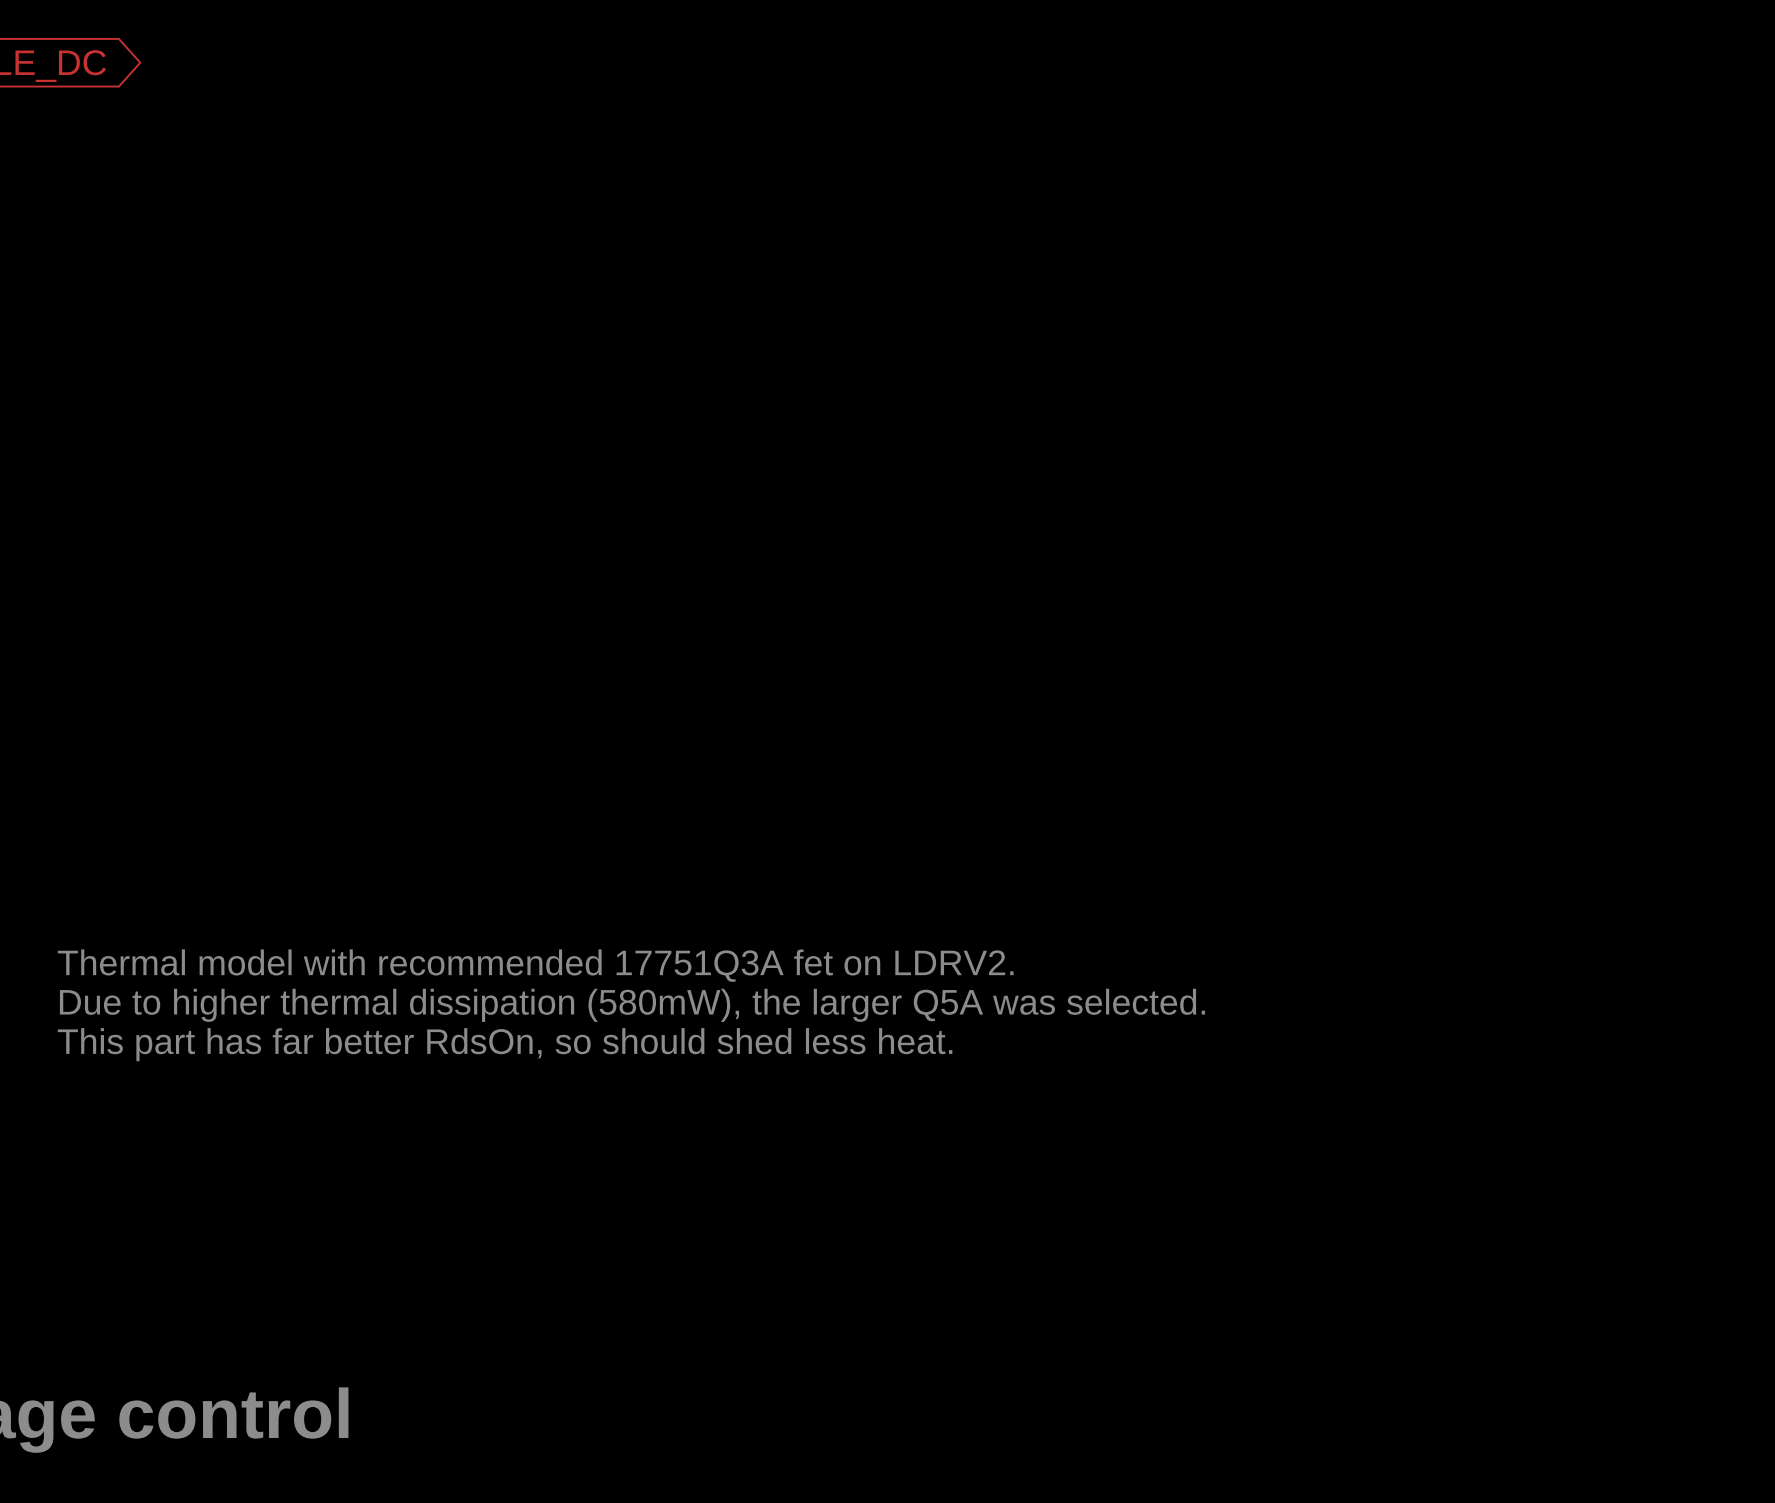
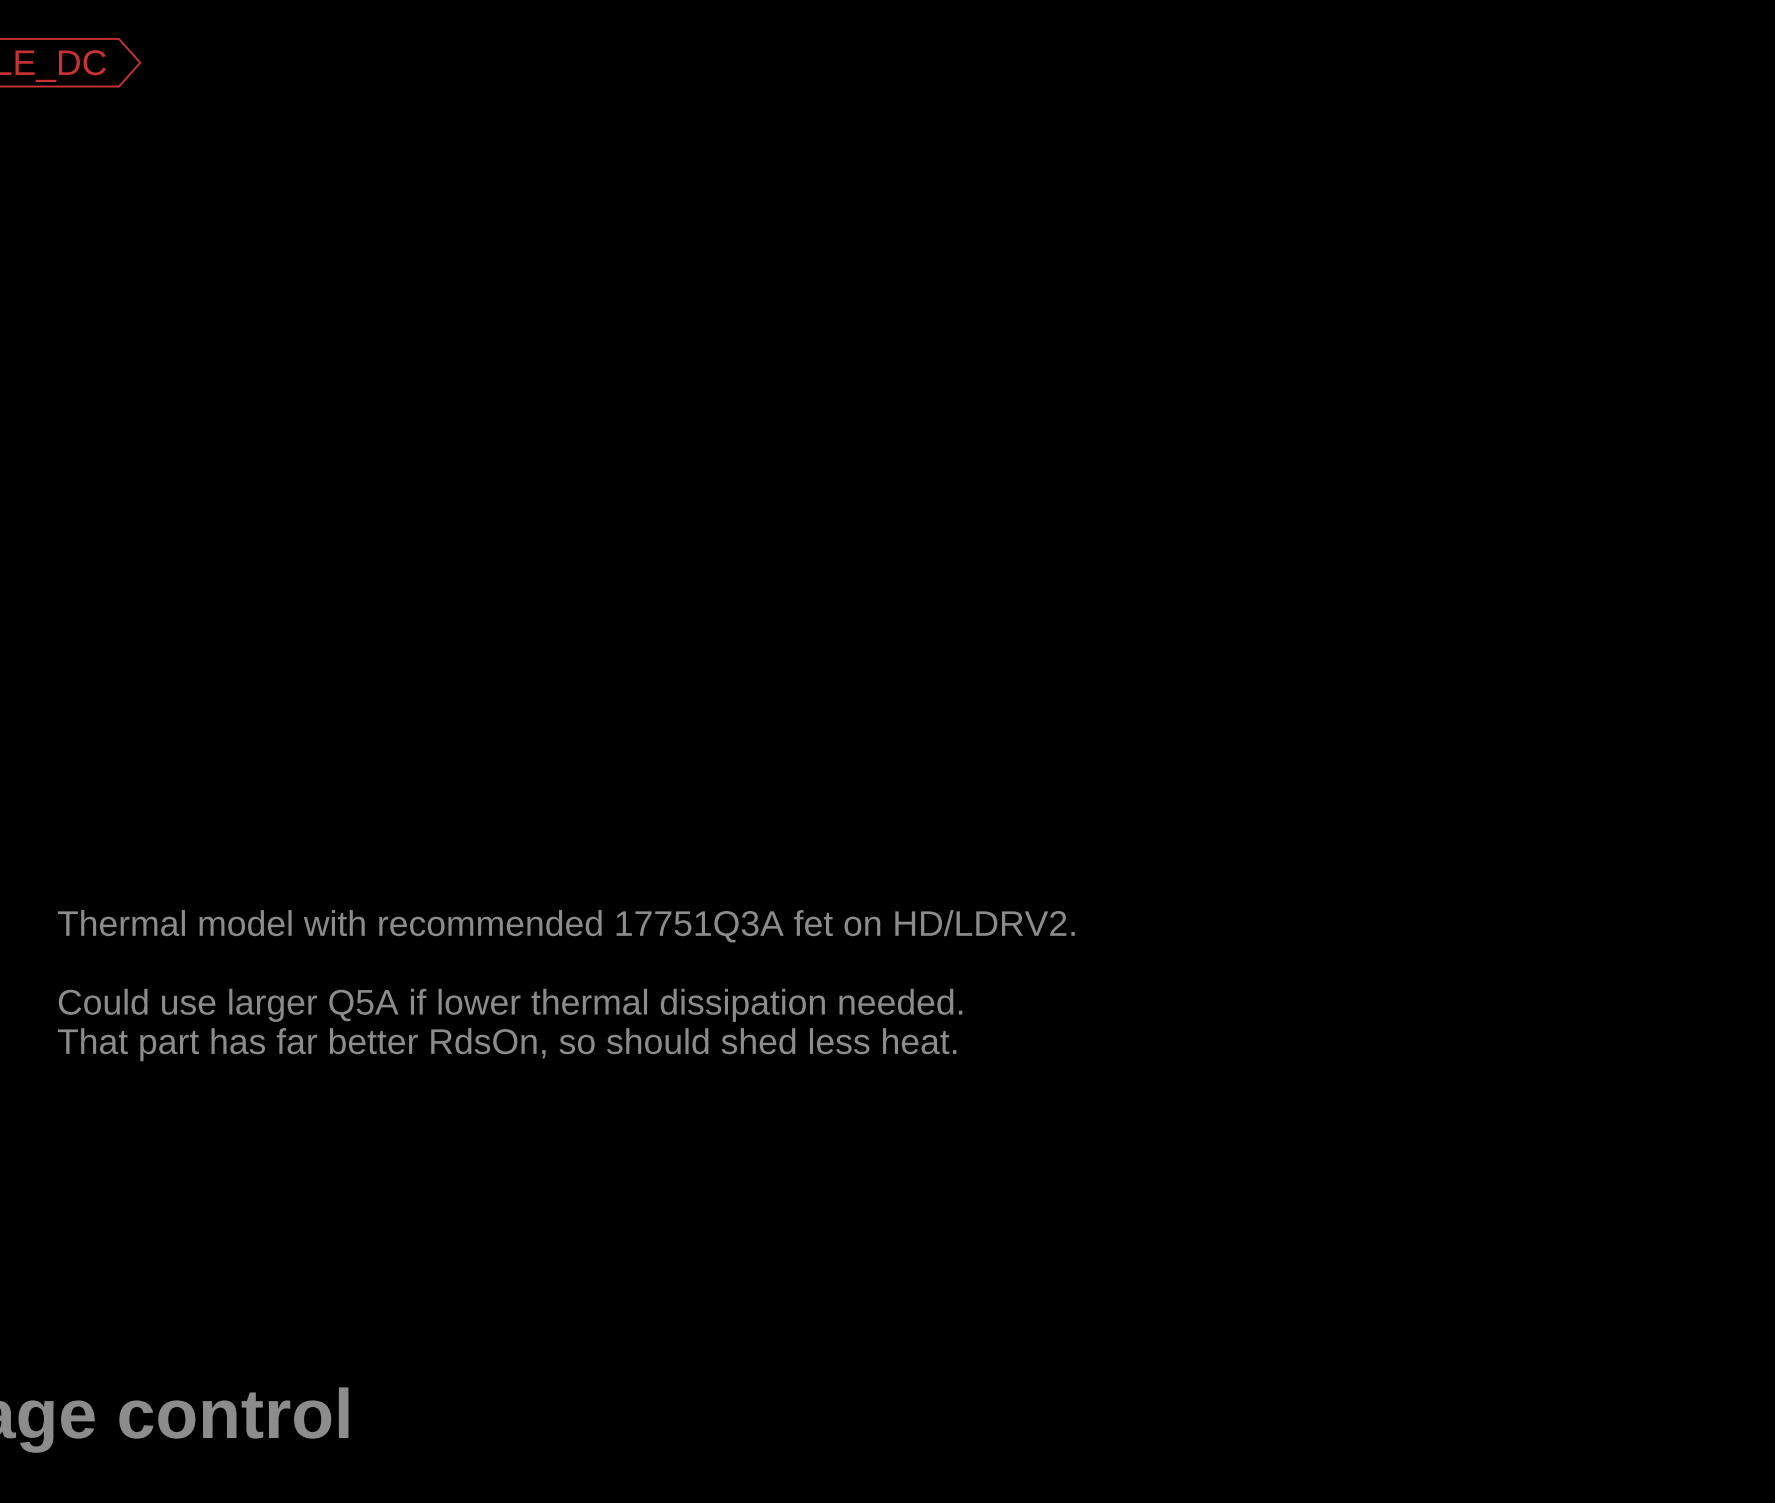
text: Thermal model with recommended 17751Q3A fet on LDRV2. (535, 965) -> Thermal model with recommended 17751Q3A fet on HD/LDRV2. (566, 926)
text: Due to higher thermal dissipation (580mW), the larger Q5A was selected. (632, 1005) -> Could use larger Q5A if lower thermal dissipation needed. (510, 1005)
text: This part has far better RdsOn, so should shed less heat. (505, 1044) -> That part has far better RdsOn, so should shed less heat. (507, 1044)

